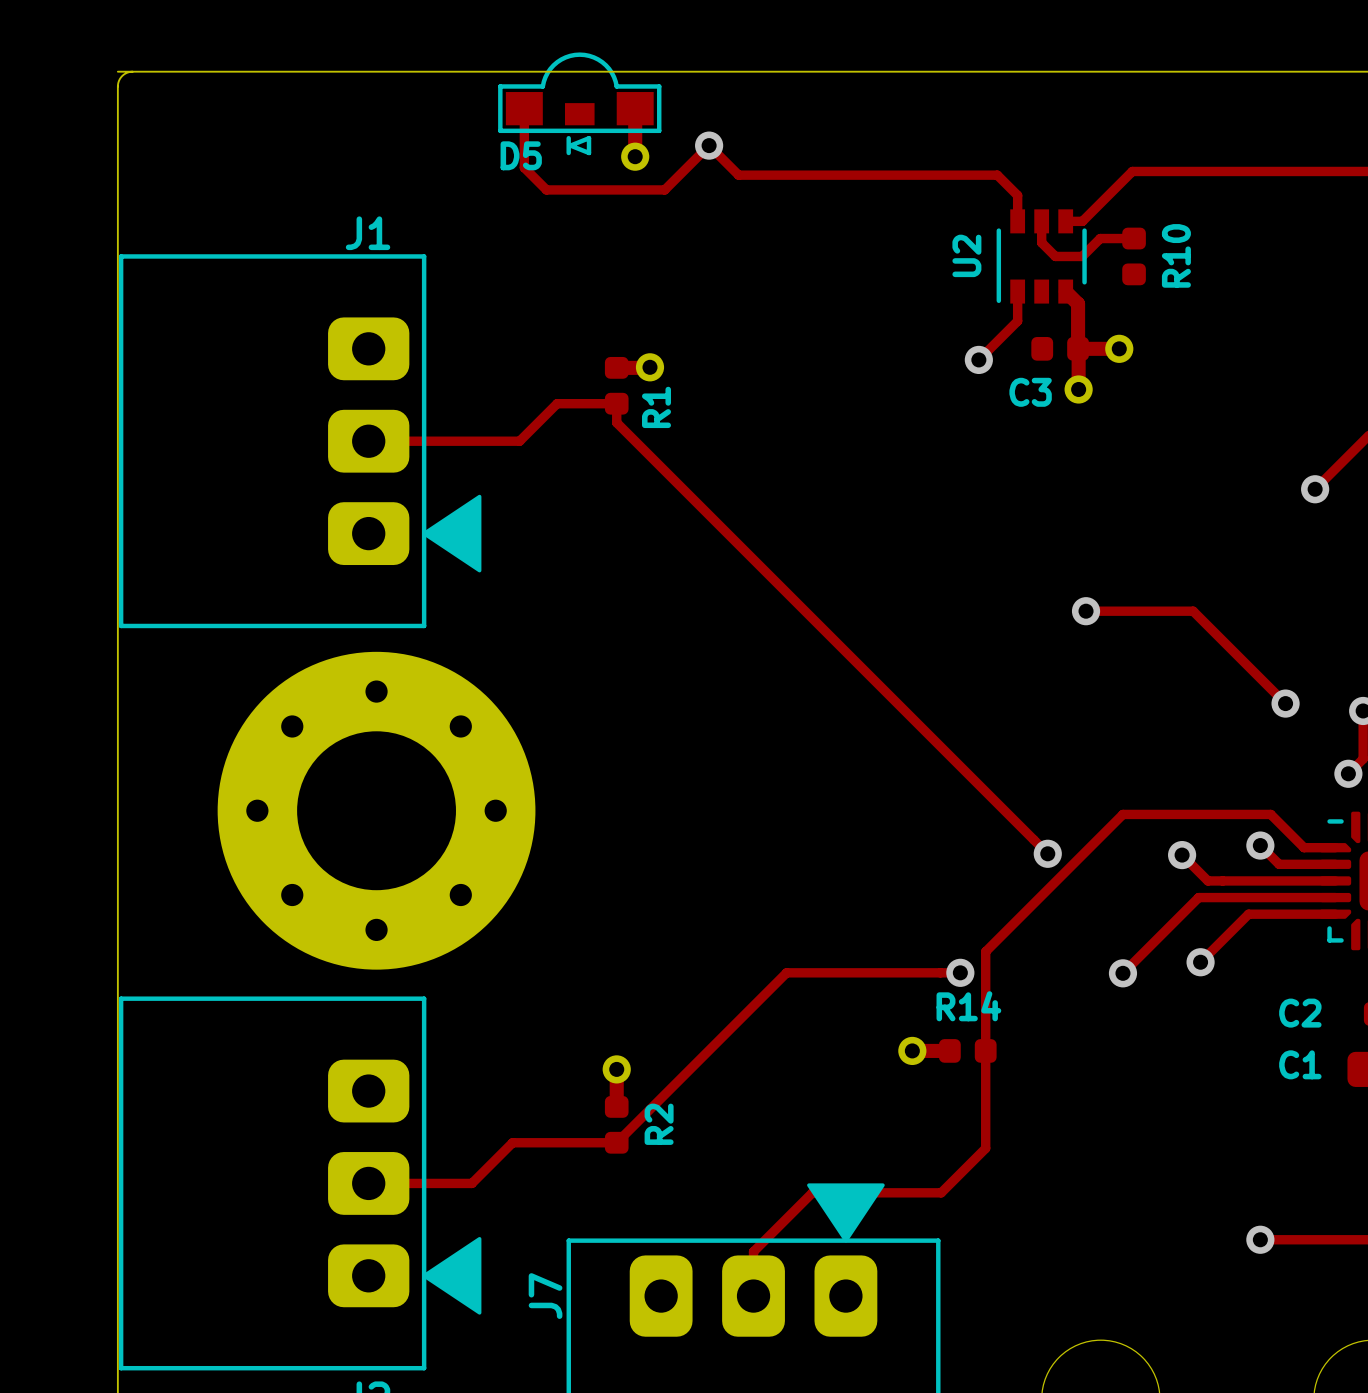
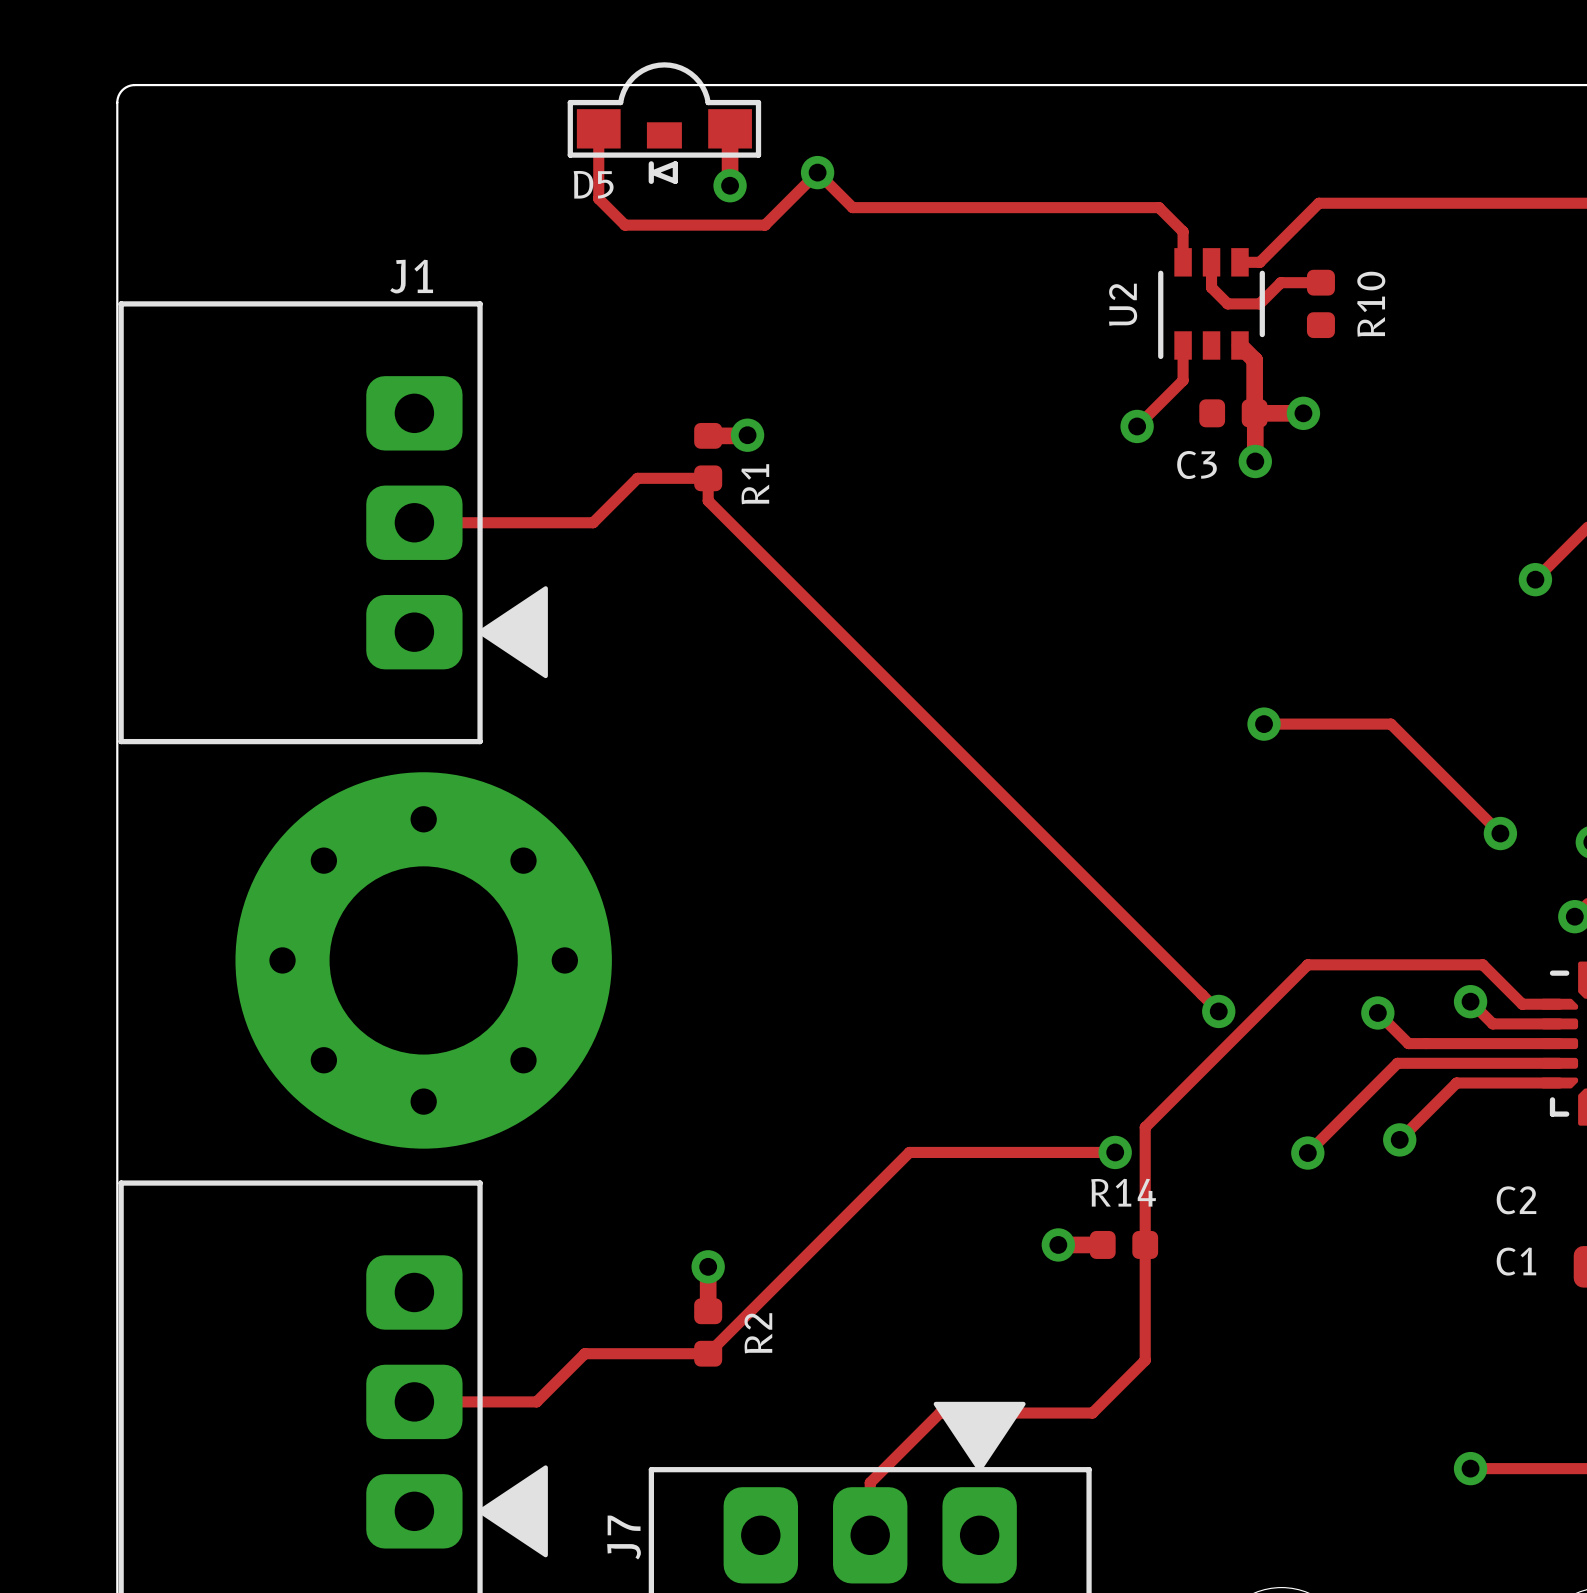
board edge: (117, 71) (132, 71) -> none

